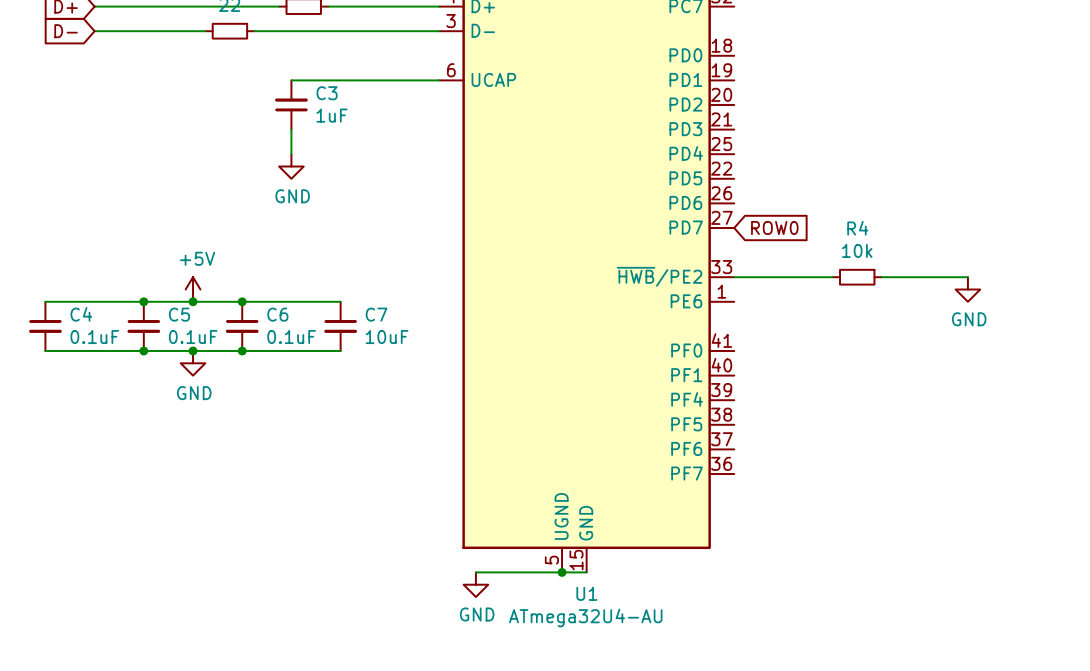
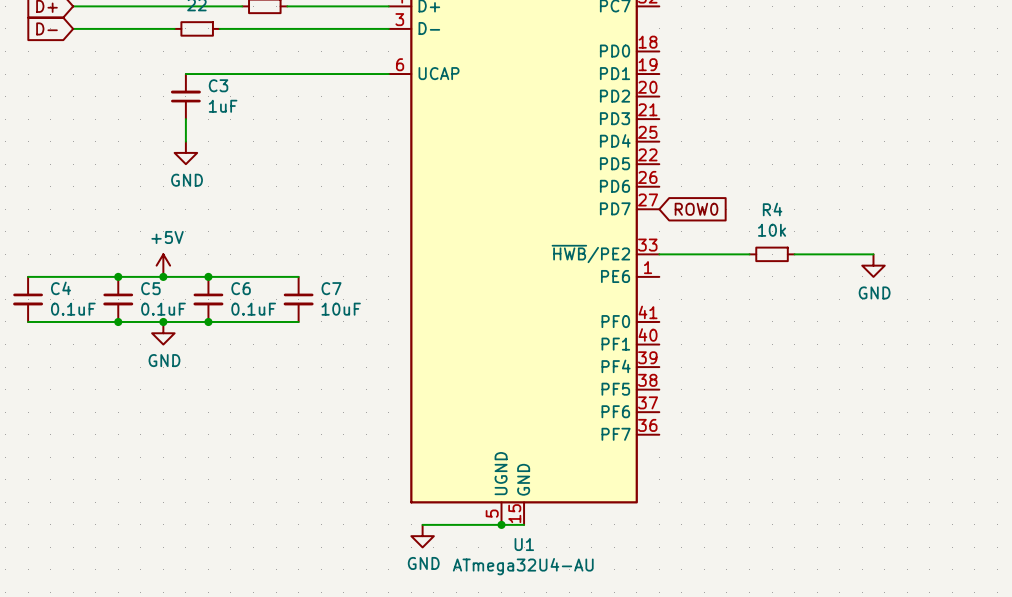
wire: none -> (185, 74) (253, 74)
C3 position: (291, 105) -> (185, 96)
wire: (291, 129) (291, 154) -> (185, 119) (185, 141)
power symbol position: GND (291, 166) -> GND (185, 152)

